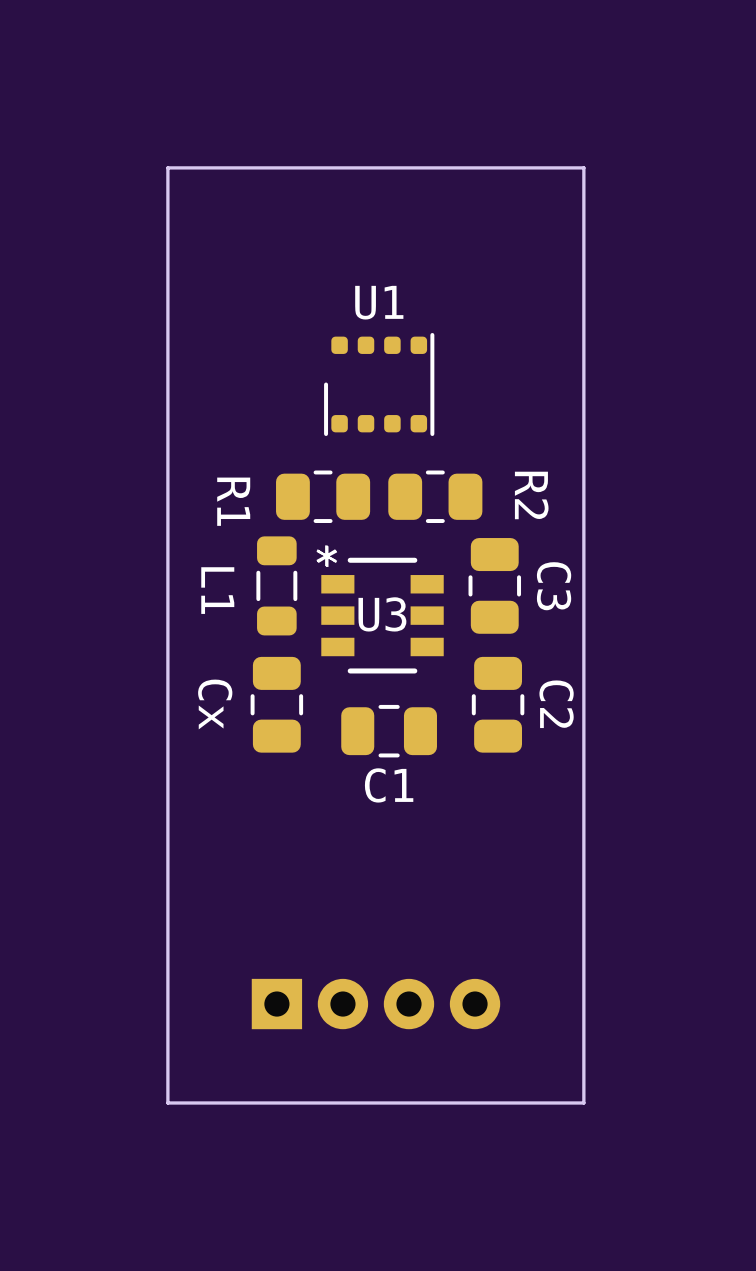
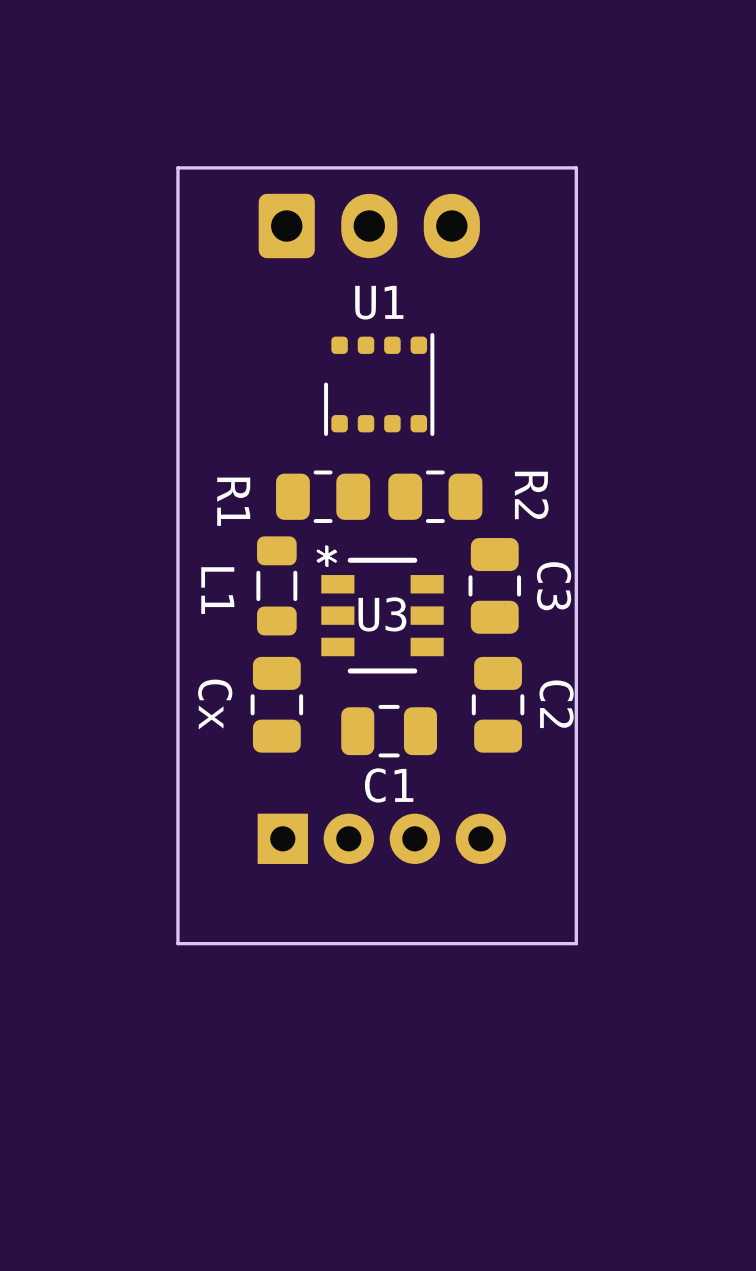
board edge: (576, 167) (583, 167) (583, 1102) (167, 1102) (167, 167) (177, 167) -> (576, 167) (576, 943) (177, 943) (177, 167)
part: none -> (369, 226)
part position: (375, 1004) -> (381, 838)

